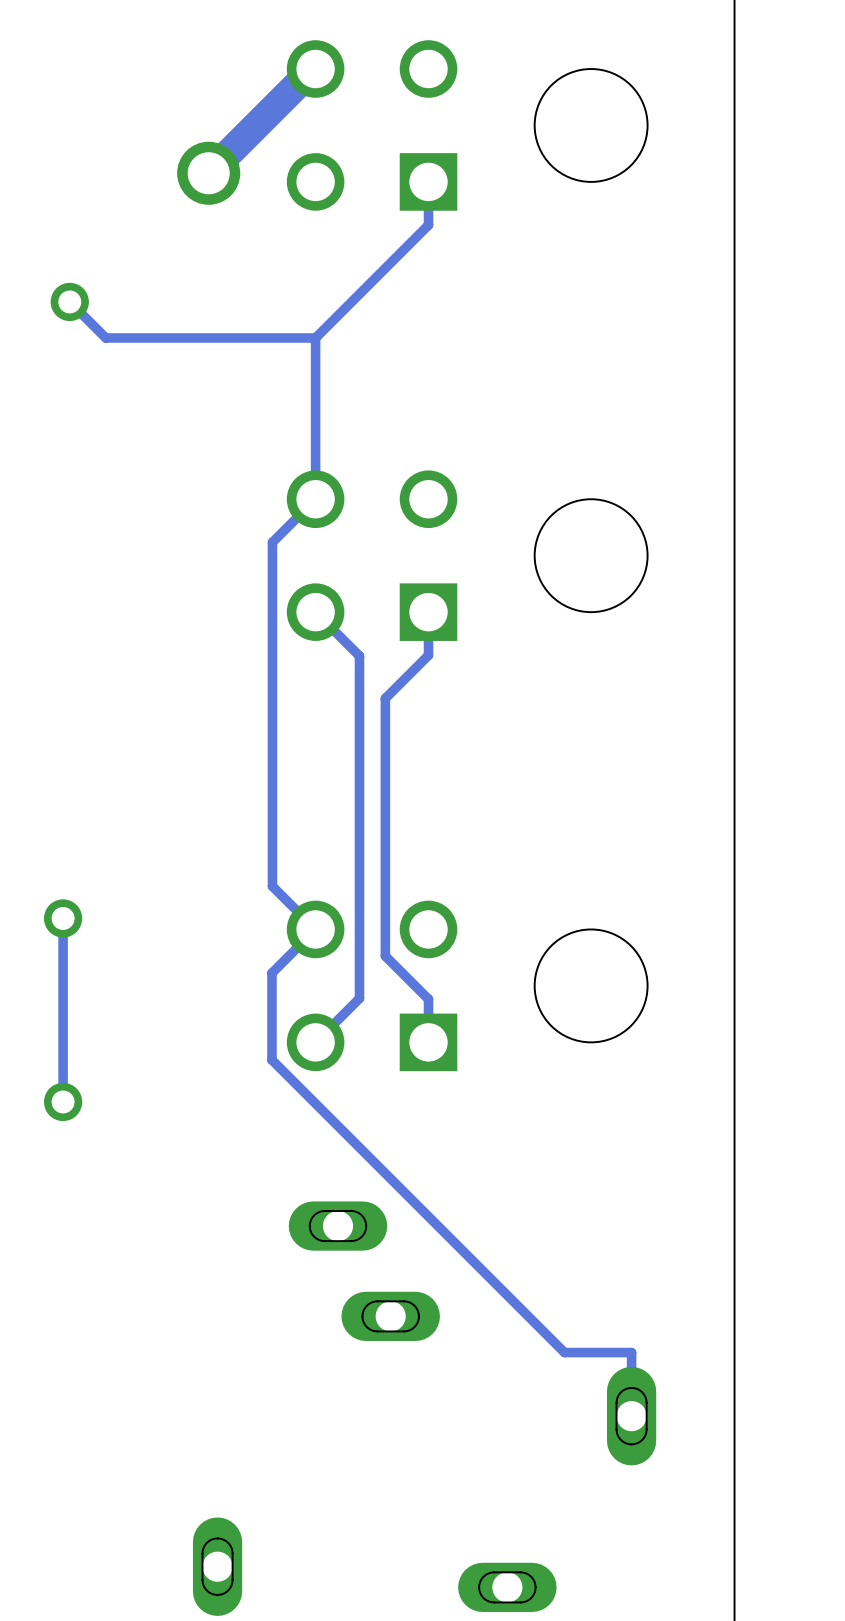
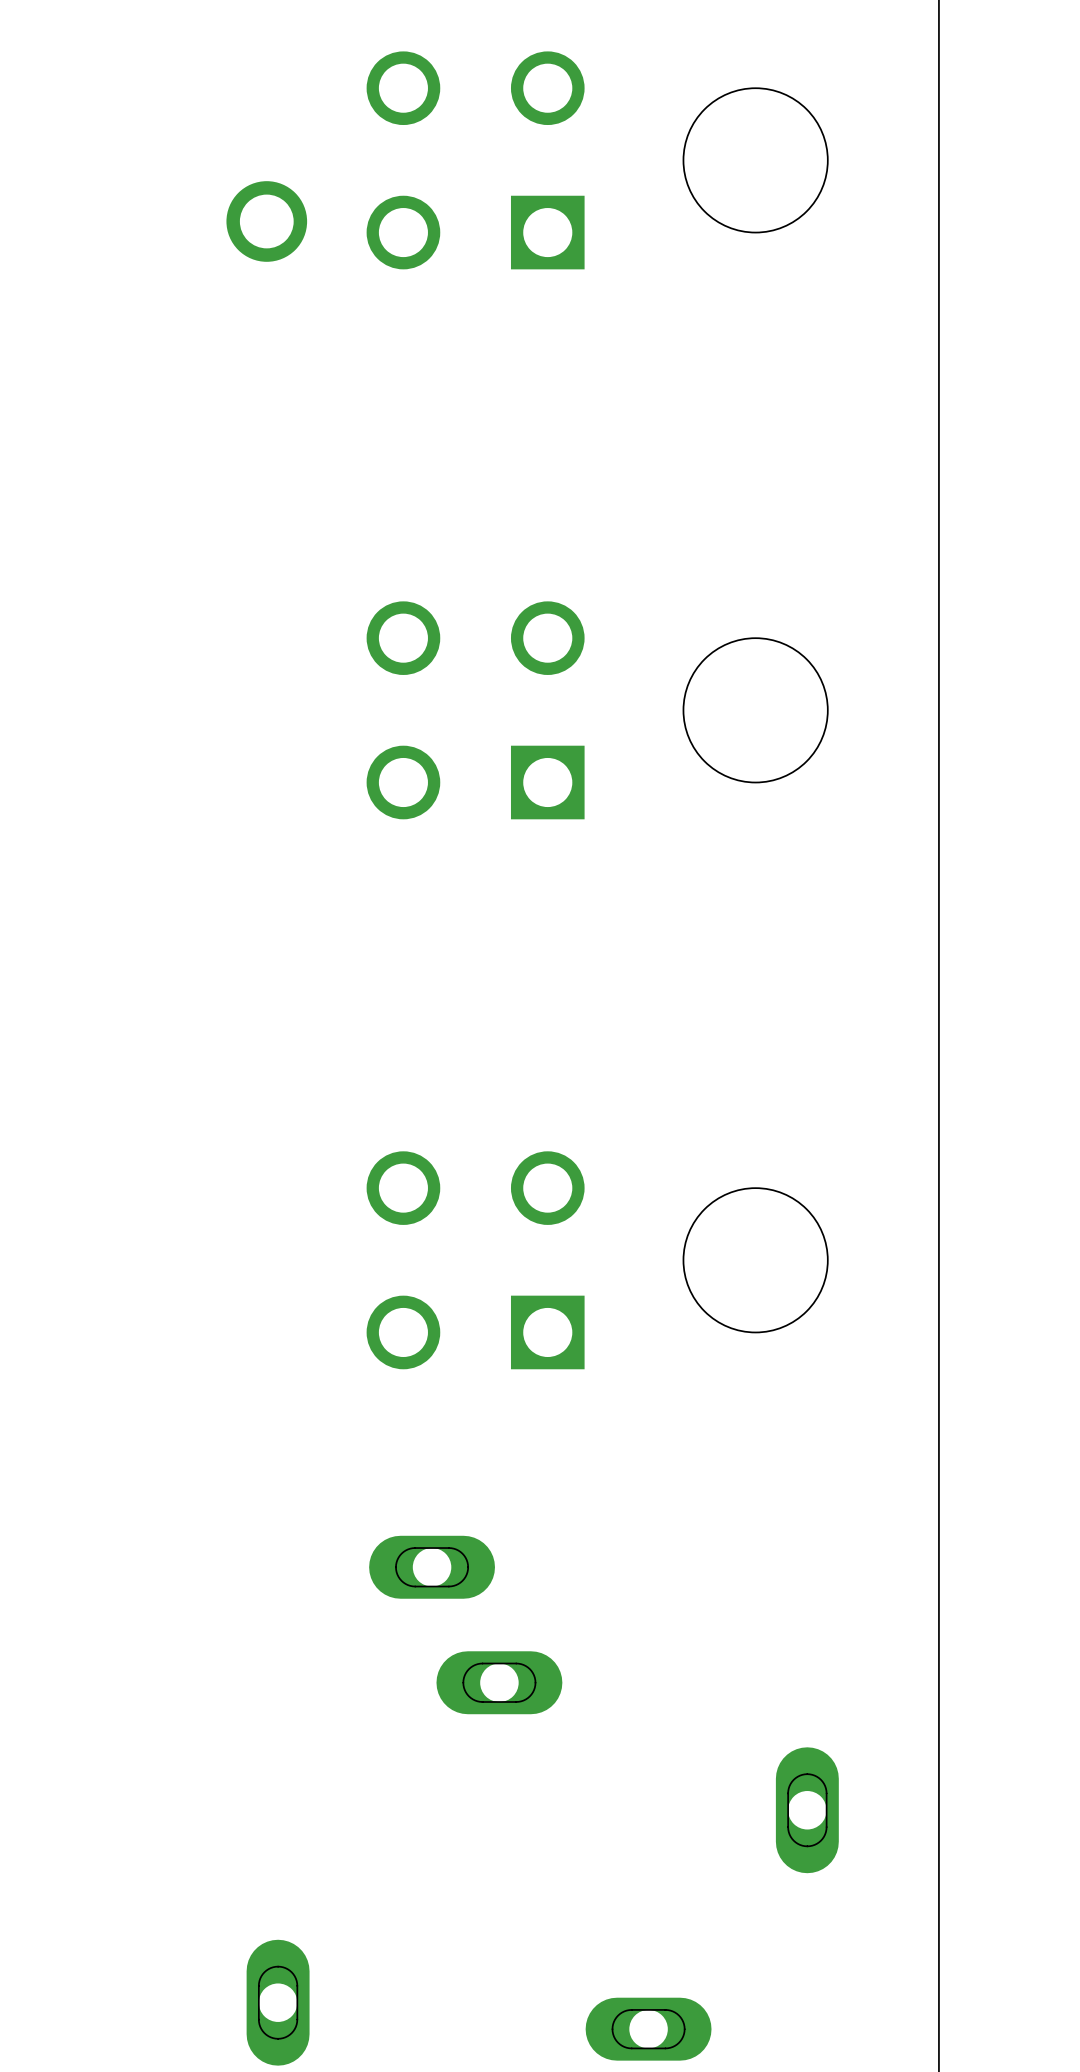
track: (315, 69) (312, 69) (208, 173) -> none
track: (428, 181) (428, 225) (315, 337) -> none
track: (69, 301) (105, 337) (315, 337) -> none
via: (69, 301) -> none
track: (315, 337) (315, 499) (272, 542) (272, 886) (315, 929) (271, 973) (271, 1060) (564, 1352) (631, 1352) (631, 1416) -> none
track: (315, 612) (359, 656) (359, 998) (315, 1042) -> none
track: (428, 612) (428, 655) (385, 698) (385, 956) (428, 999) (428, 1042) -> none
track: (63, 918) (63, 1101) -> none
via: (63, 918) -> none
via: (63, 1101) -> none

